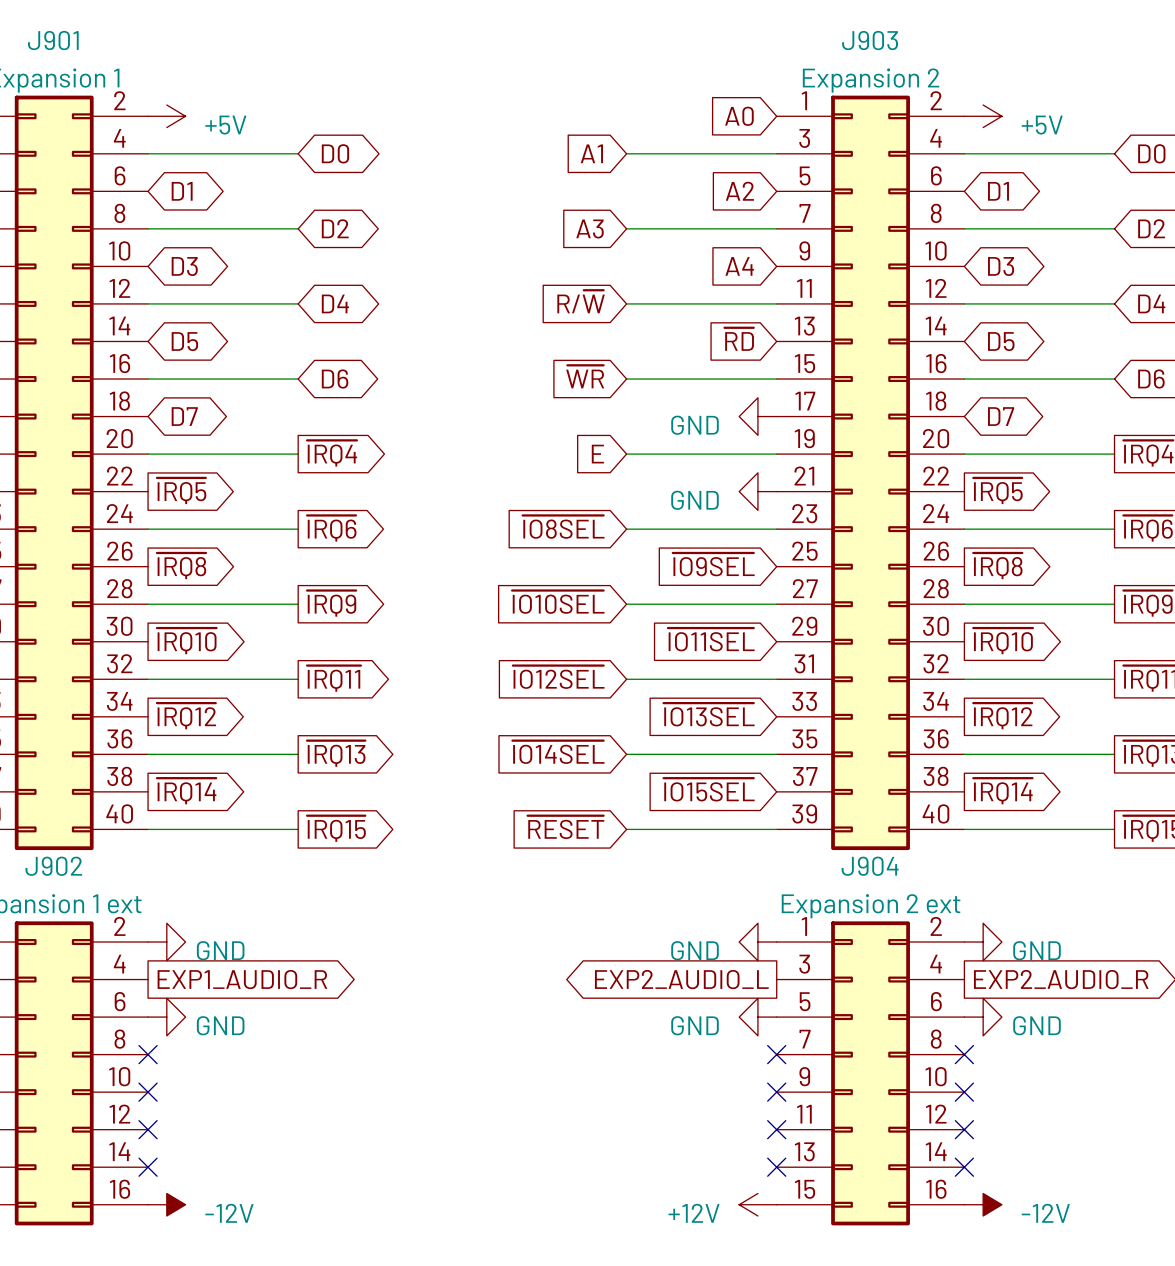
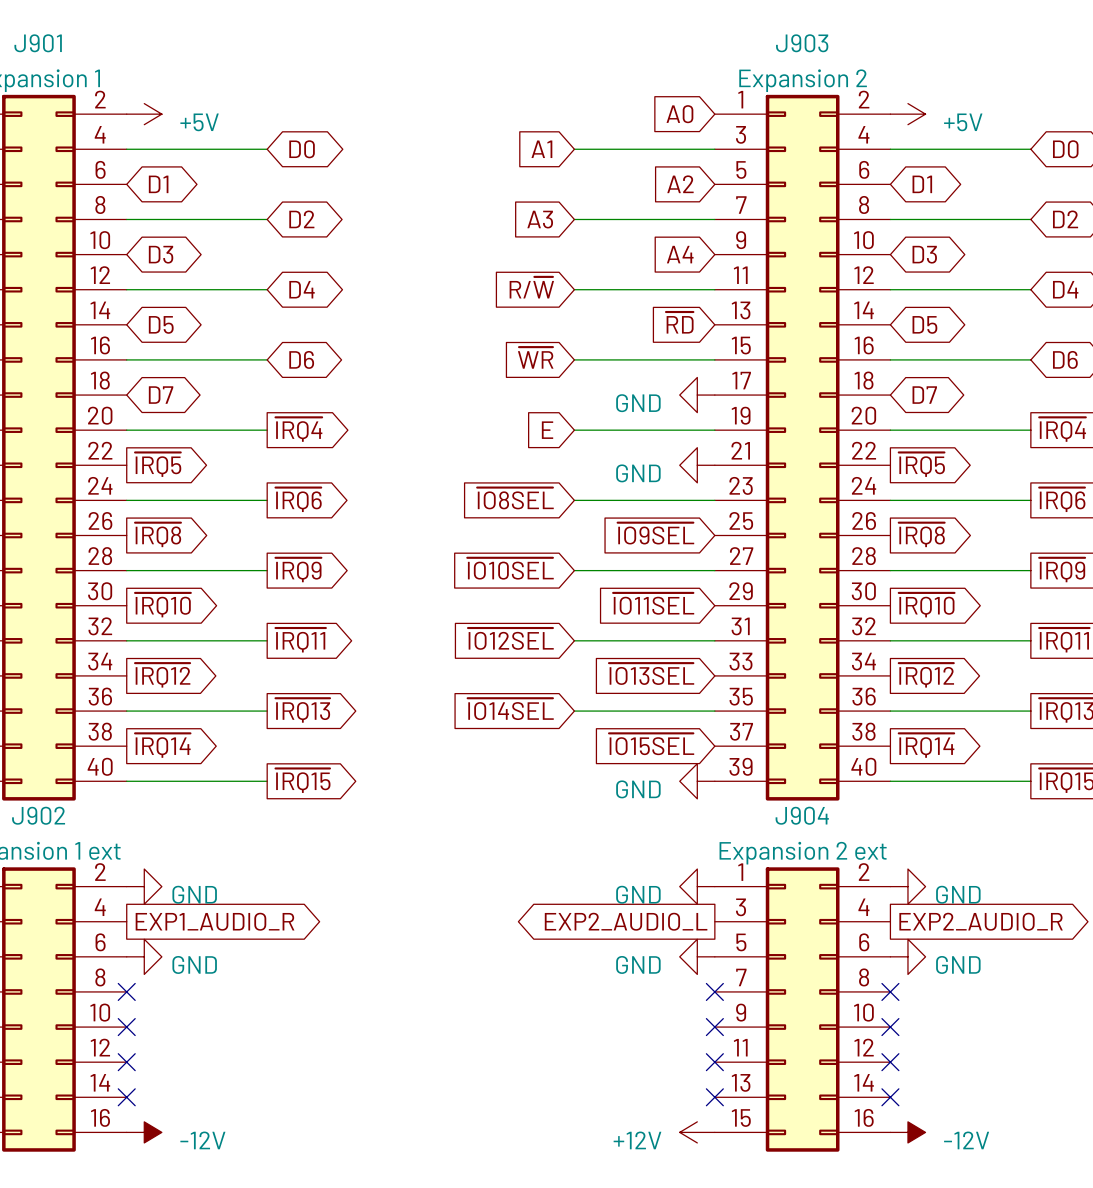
global label: ~{RESET} (565, 827) -> none
wire: (626, 829) (776, 829) -> none
power symbol: none -> GND (697, 781)

